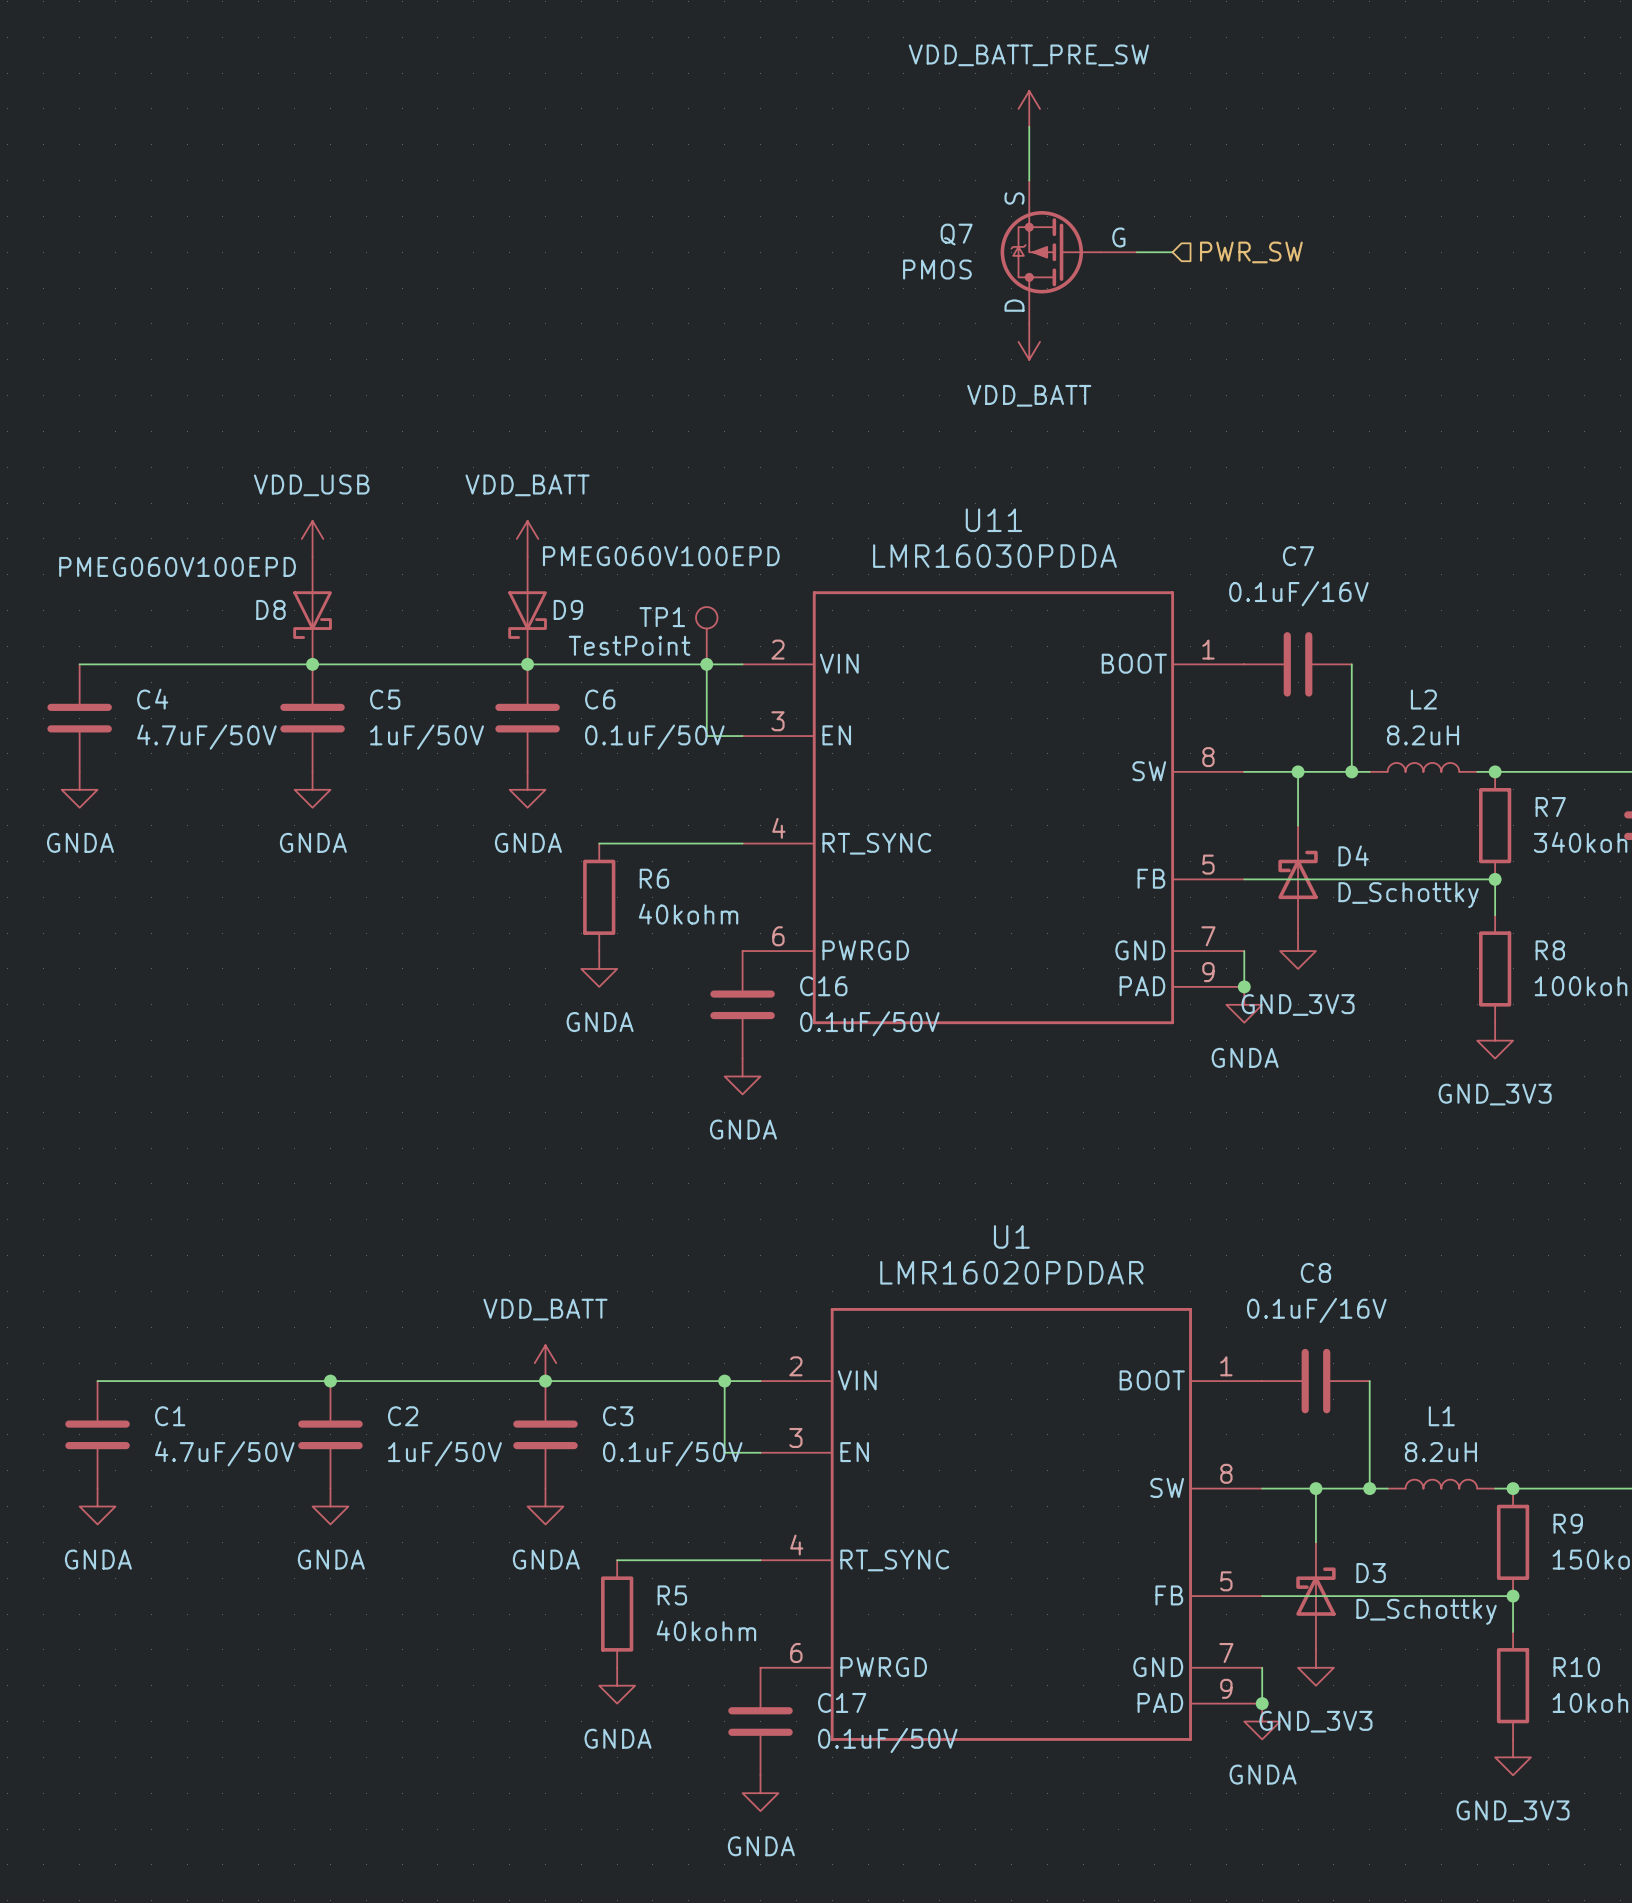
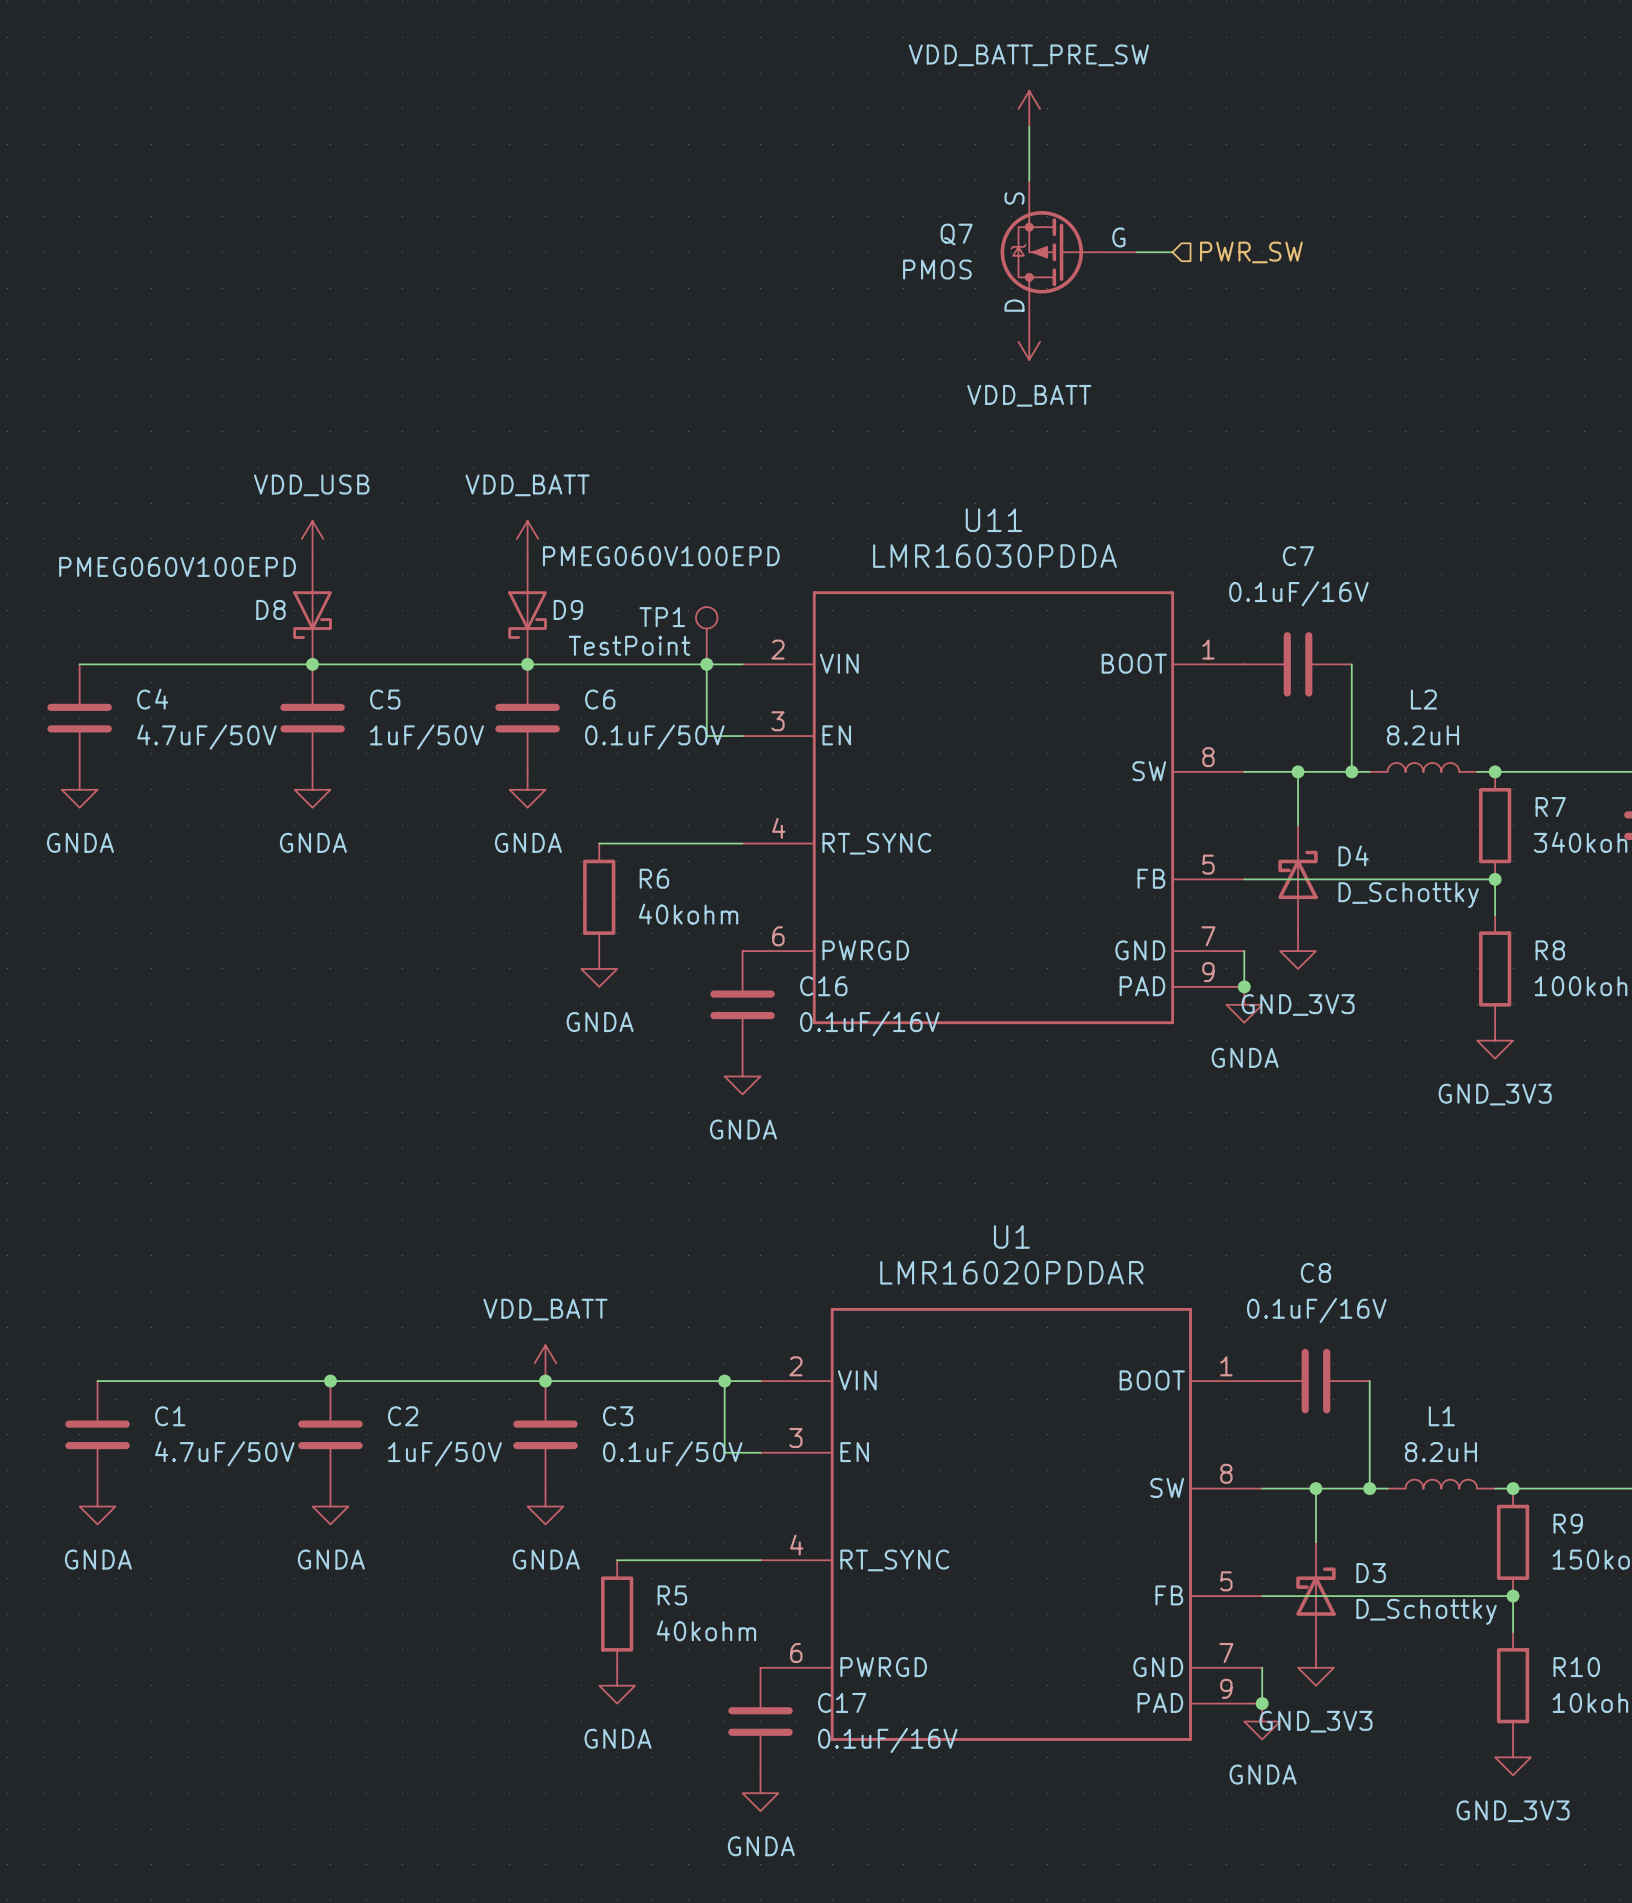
C16 value: 0.1uF/50V (869, 1023) -> 0.1uF/16V (869, 1023)
C17 value: 0.1uF/50V (887, 1740) -> 0.1uF/16V (887, 1740)

